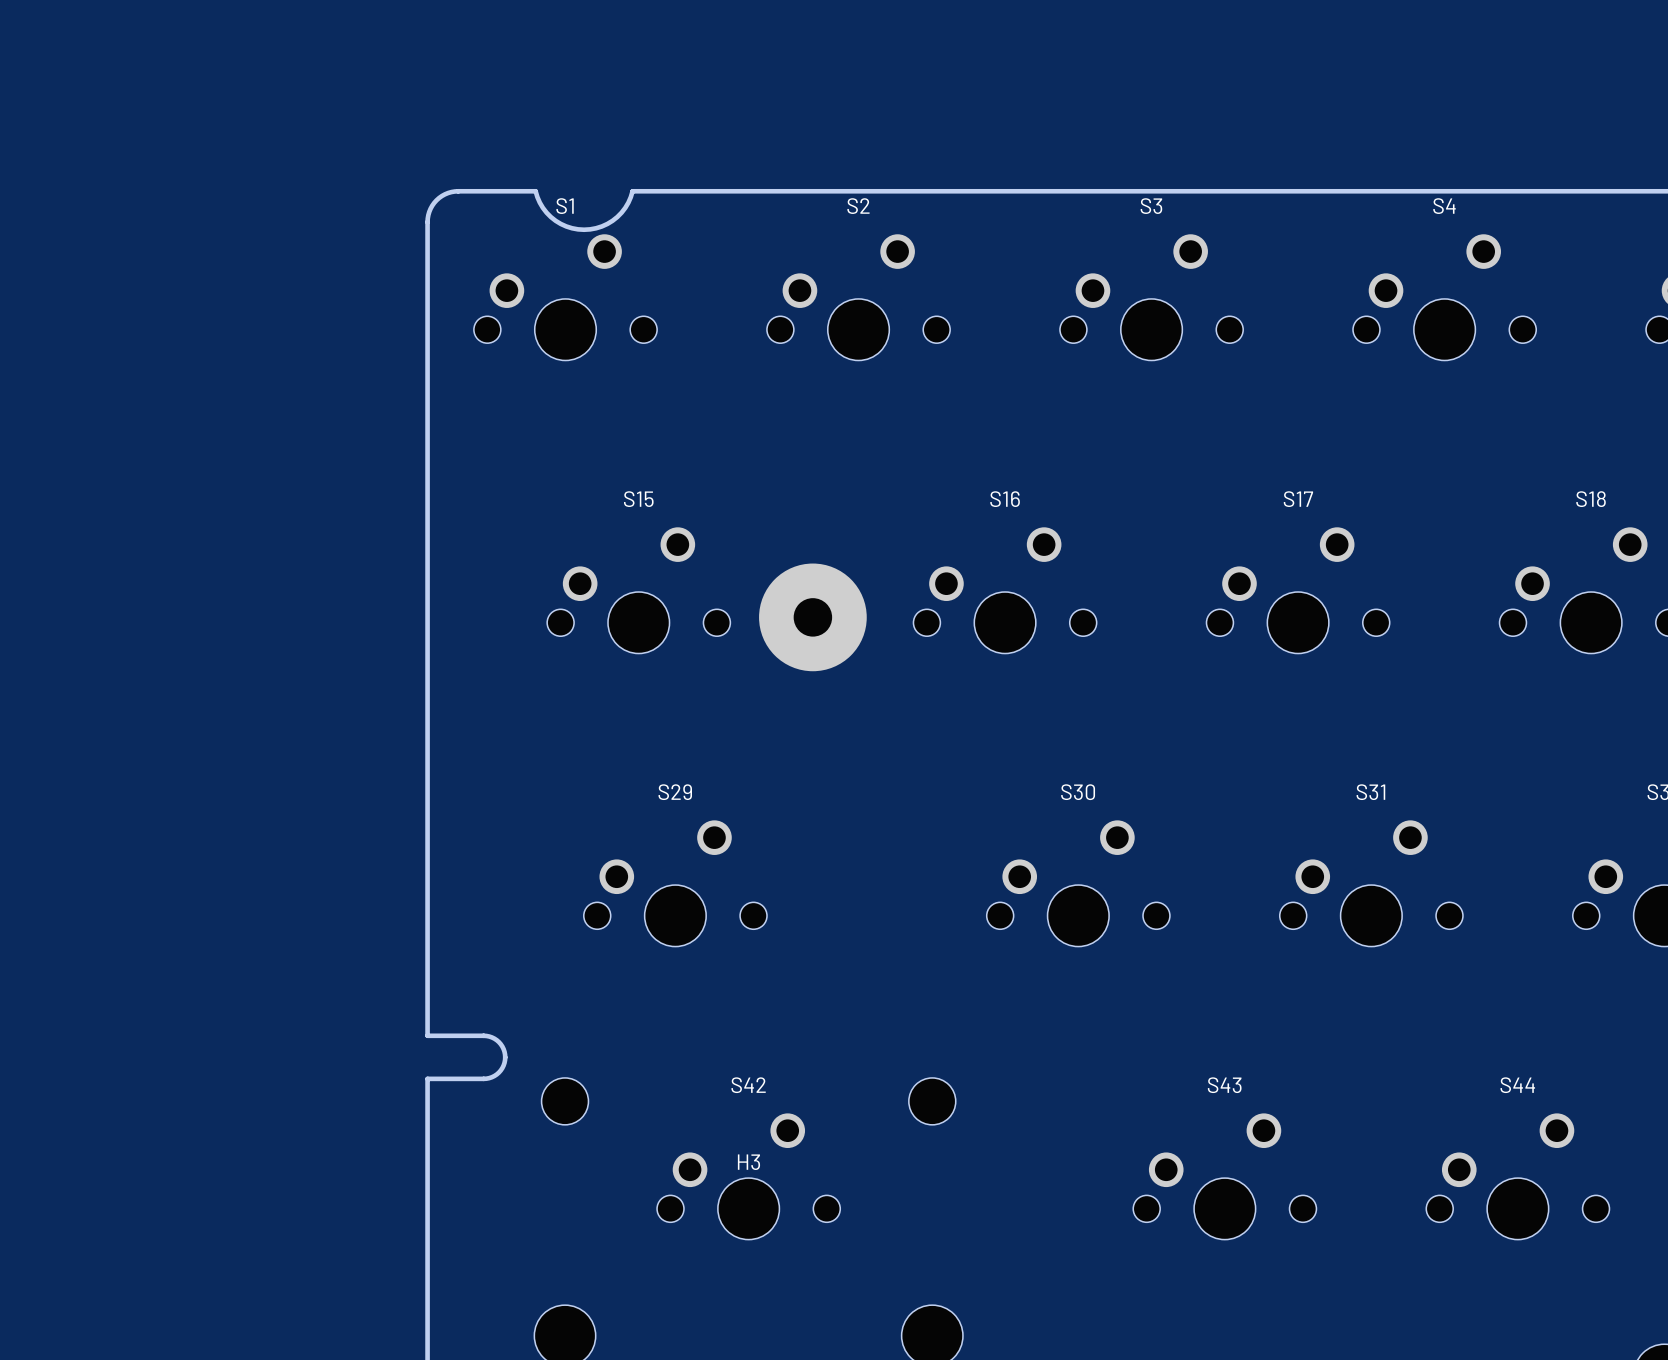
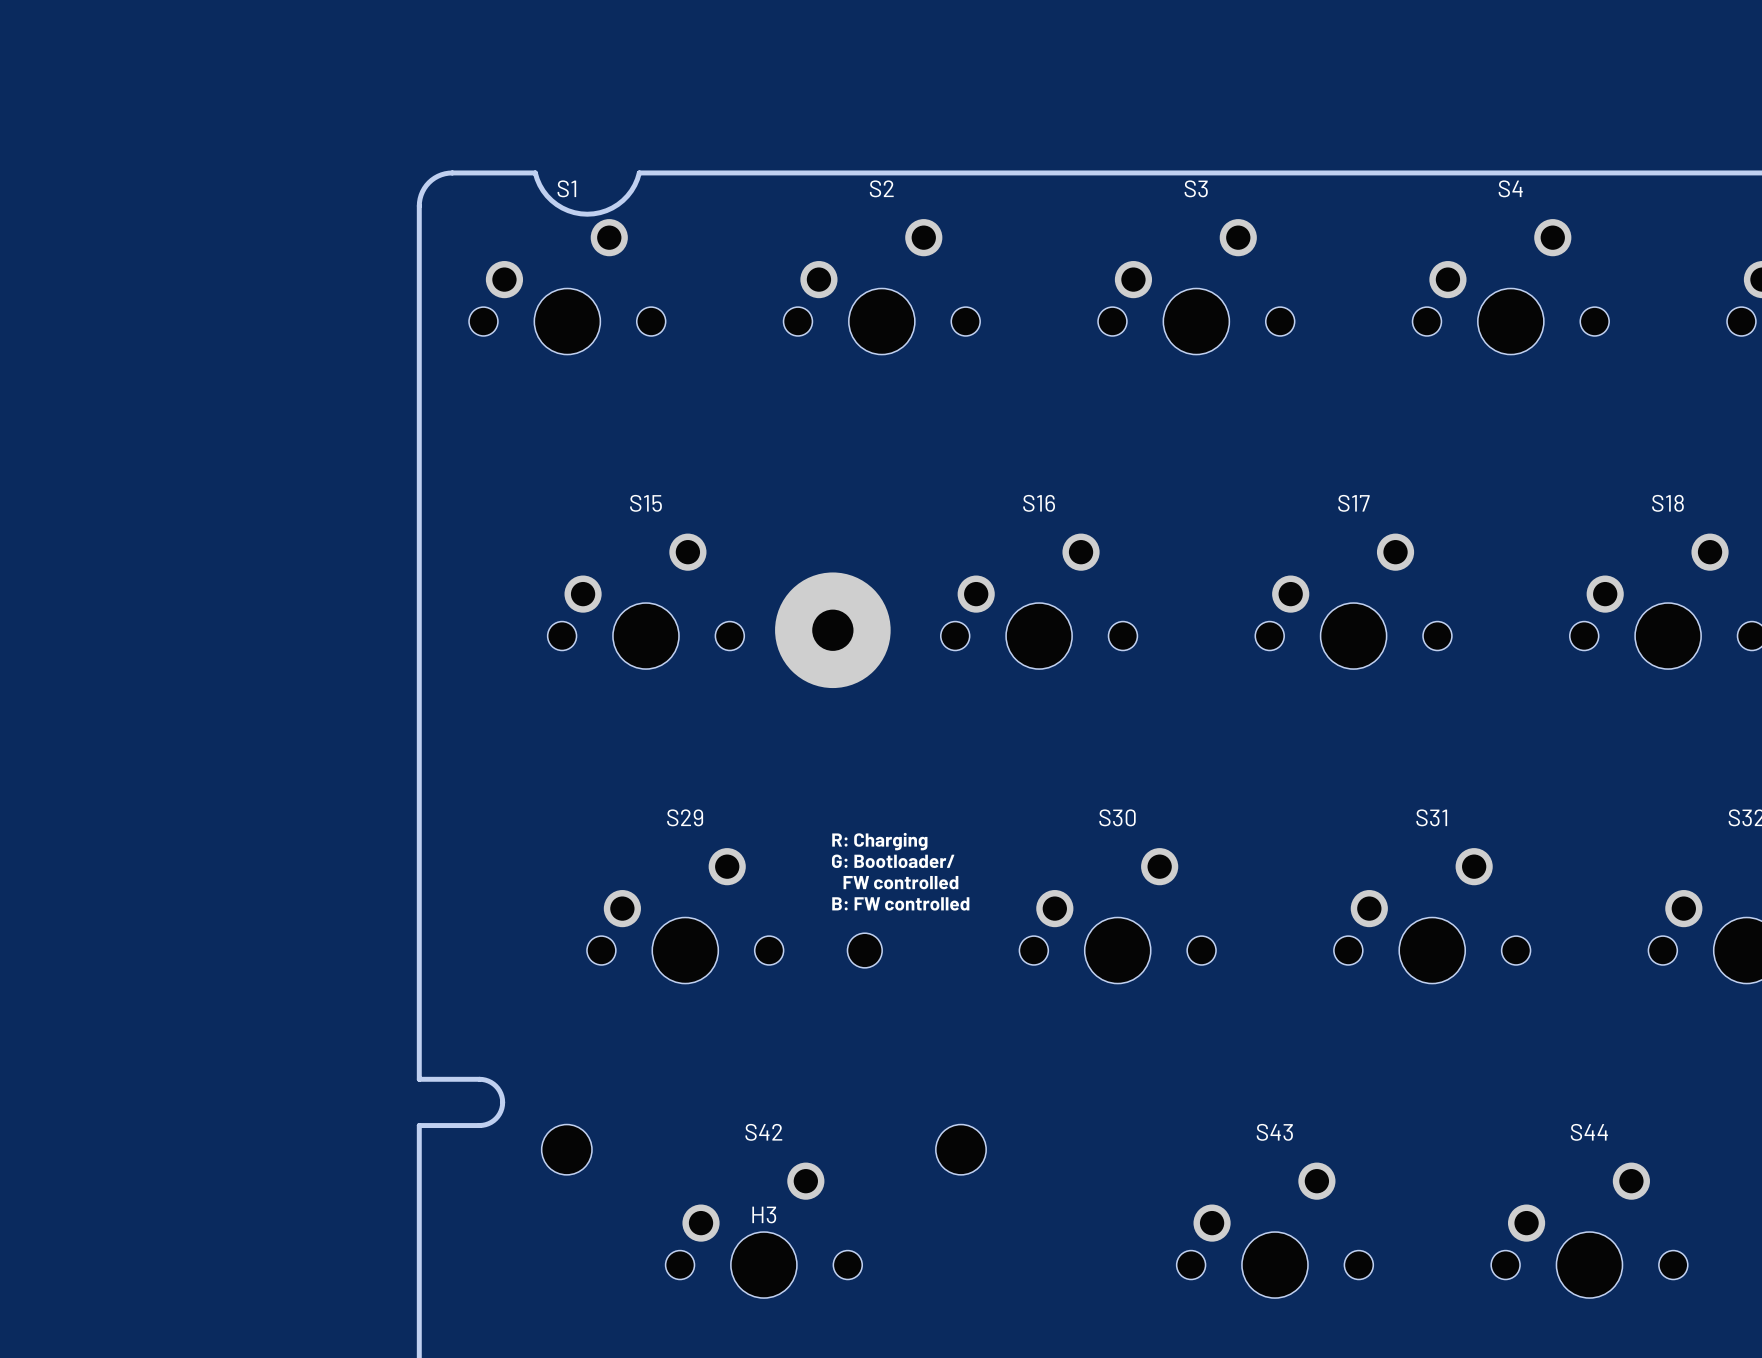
text: none -> R: Charging (879, 841)
text: none -> G: Bootloader/ (893, 861)
text: none -> FW controlled (900, 882)
text: none -> B: FW controlled (900, 903)
part: none -> (864, 950)

